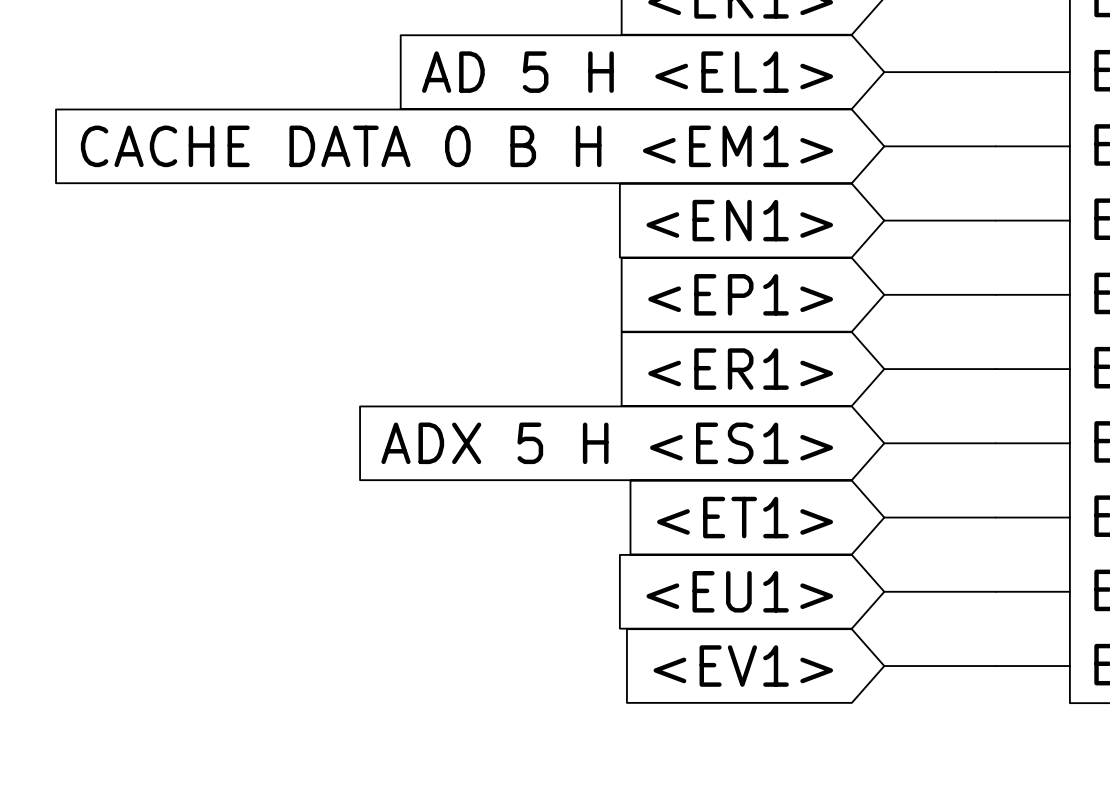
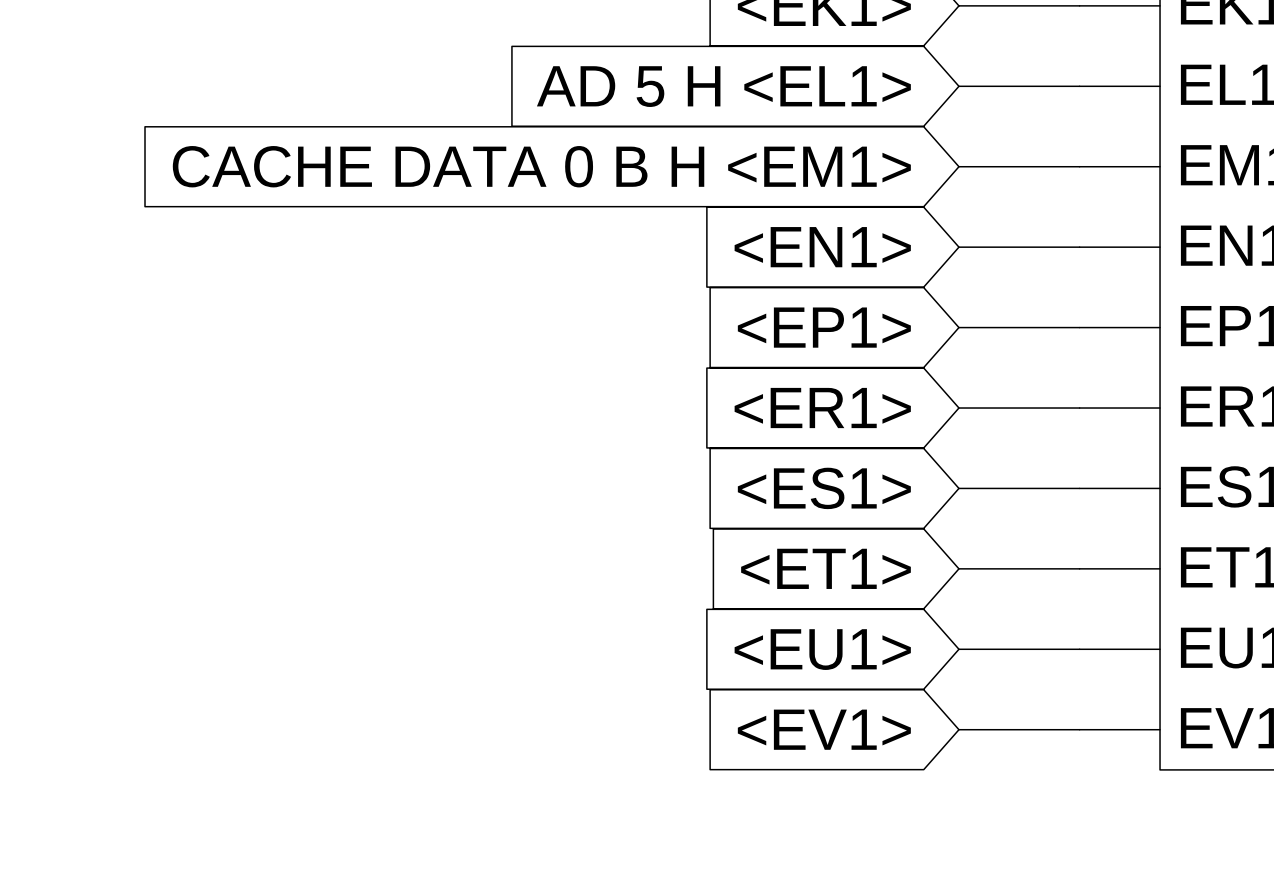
global label: ADX 5 H <ES1> (607, 443) -> <ES1> (824, 488)

